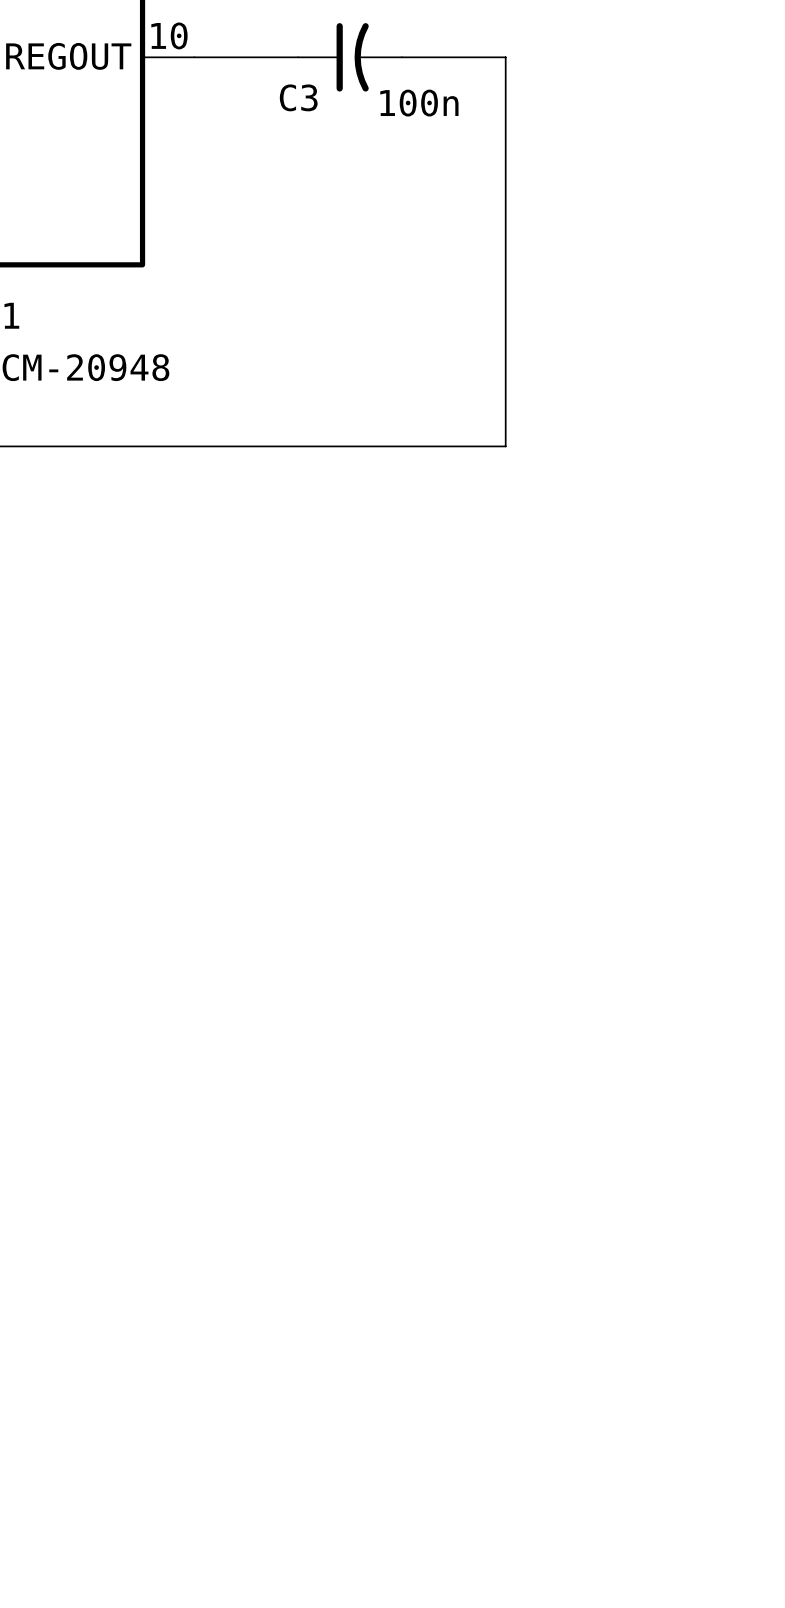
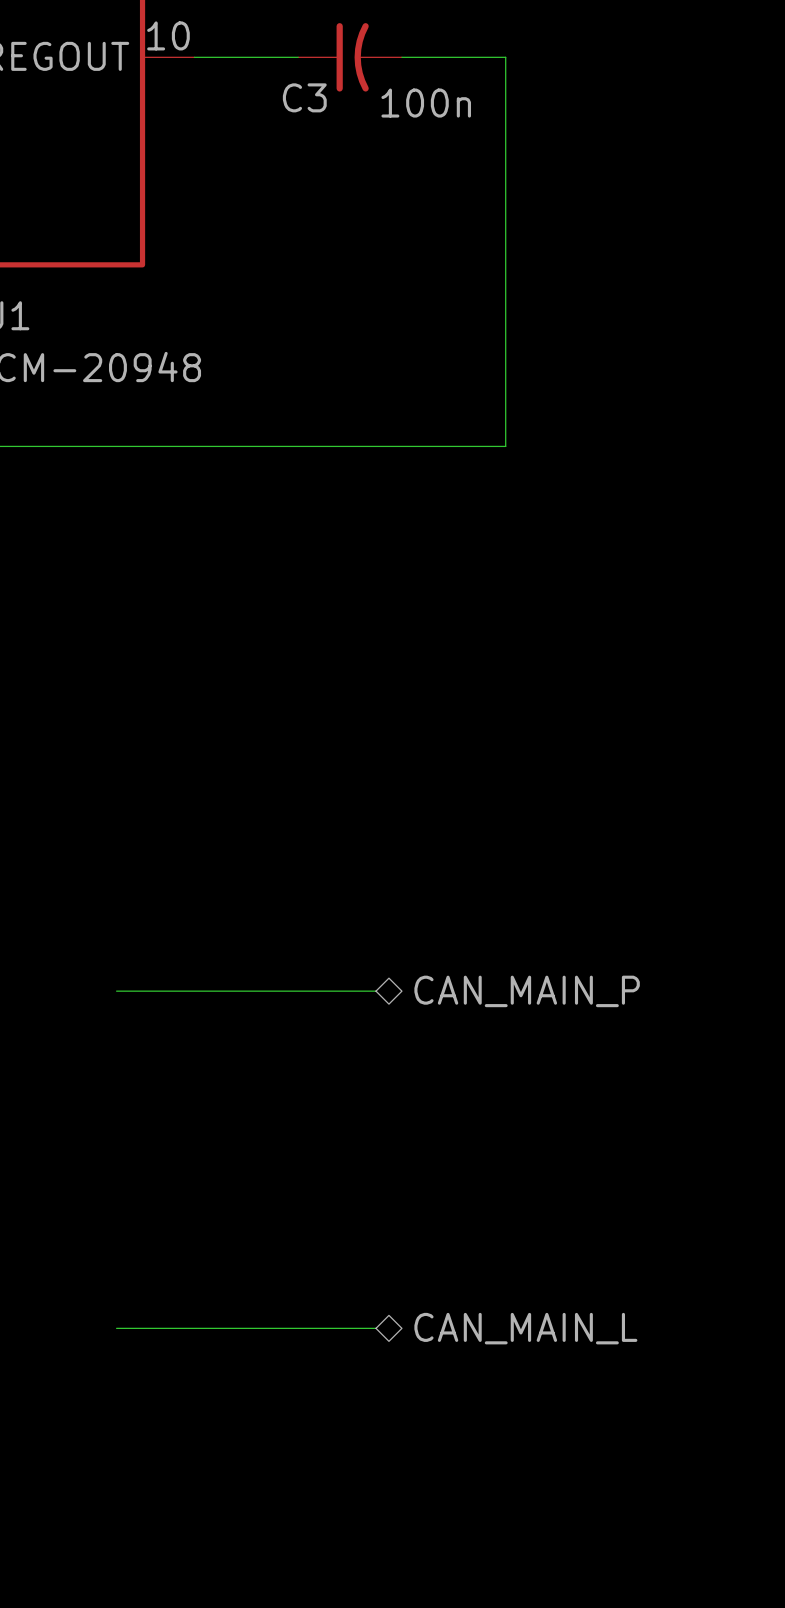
wire: none -> (116, 991) (375, 991)
hierarchical label: none -> CAN_MAIN_P (527, 991)
wire: none -> (116, 1328) (375, 1328)
hierarchical label: none -> CAN_MAIN_L (525, 1328)

